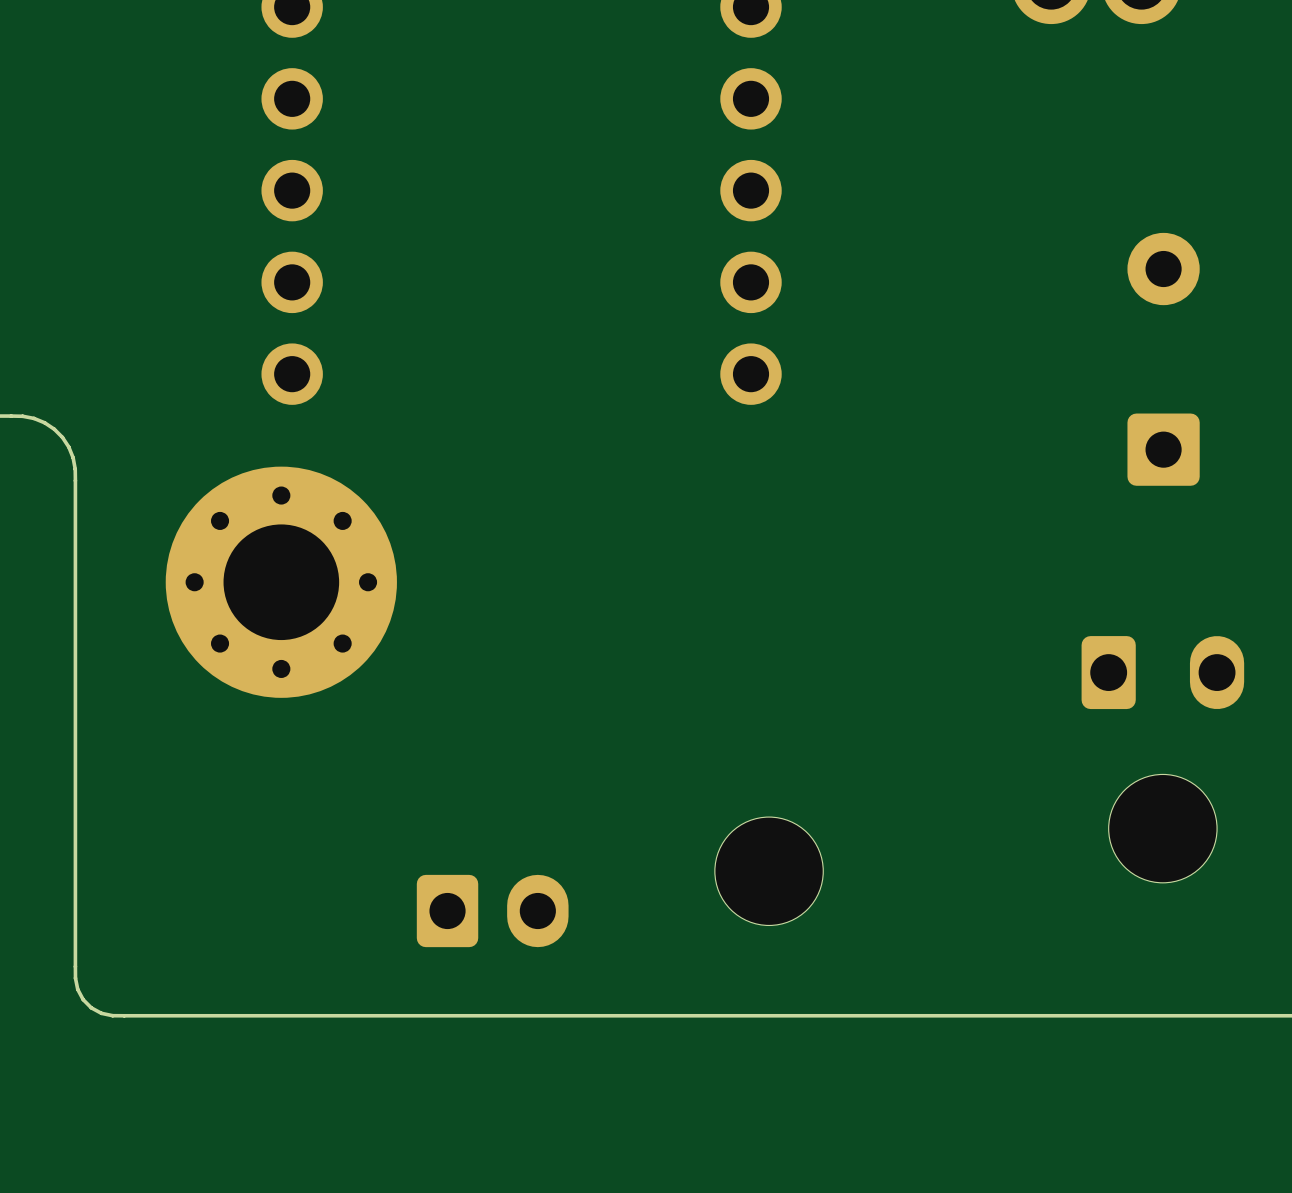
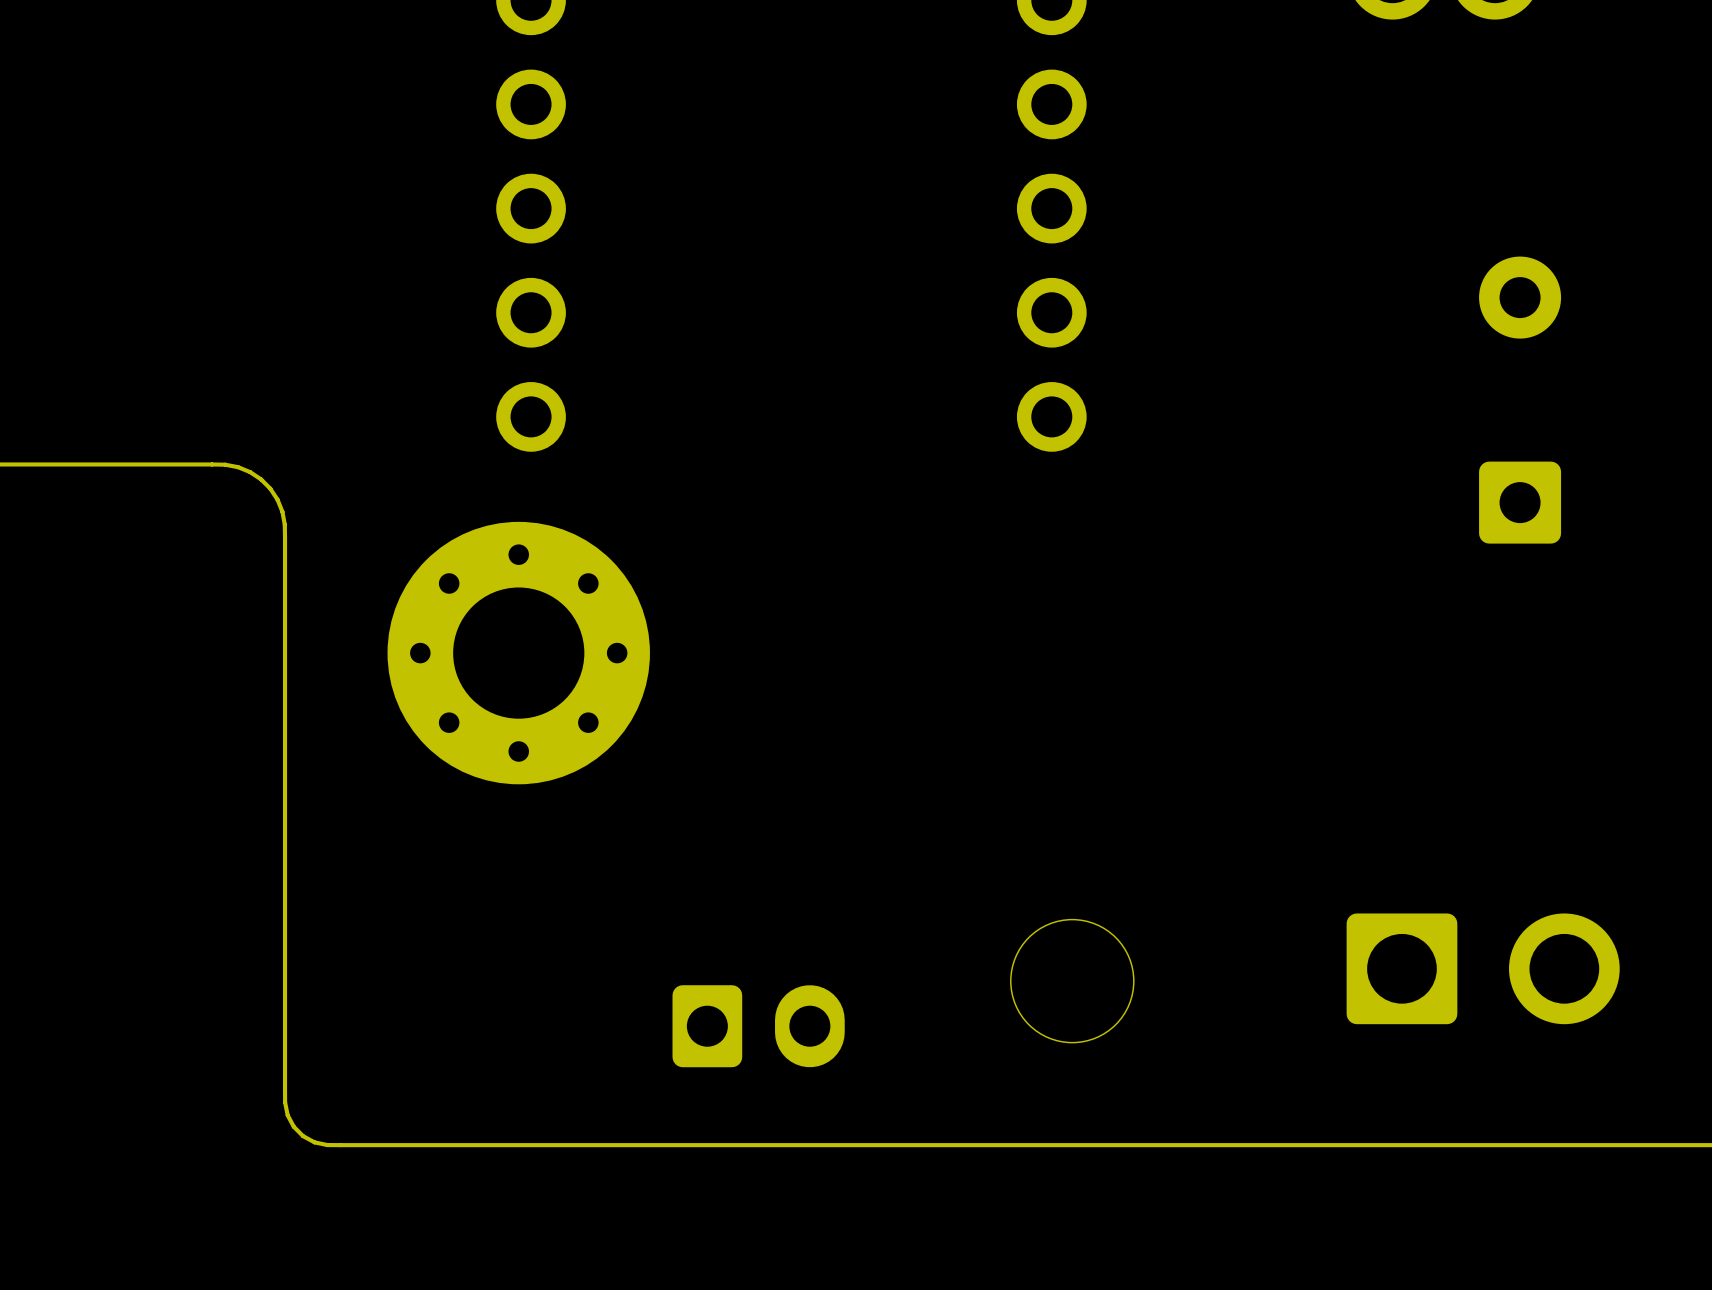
part: (1162, 759) -> none
part: none -> (1483, 968)

